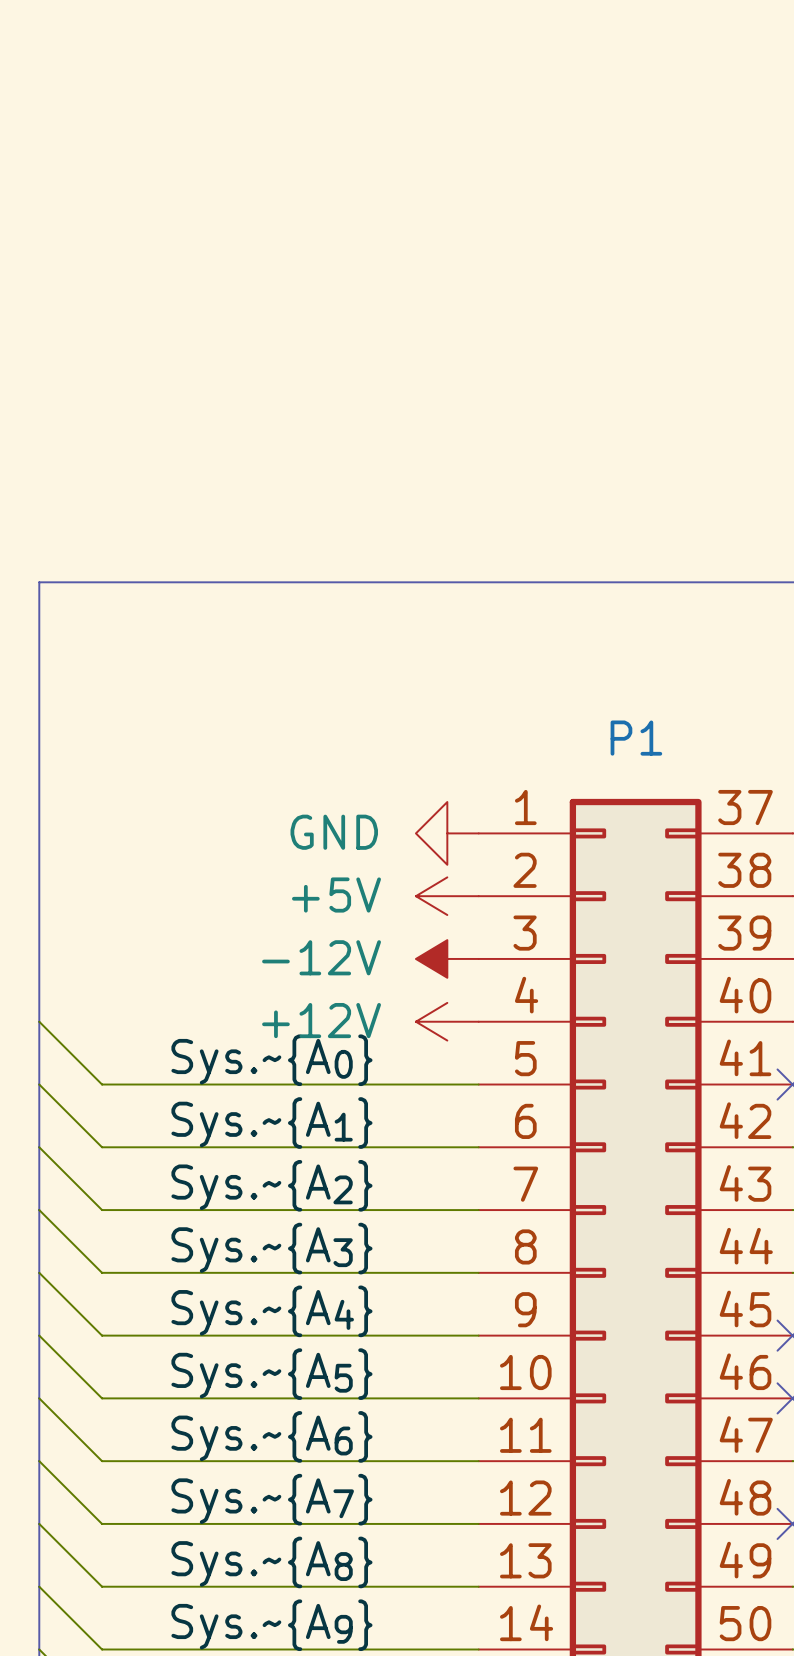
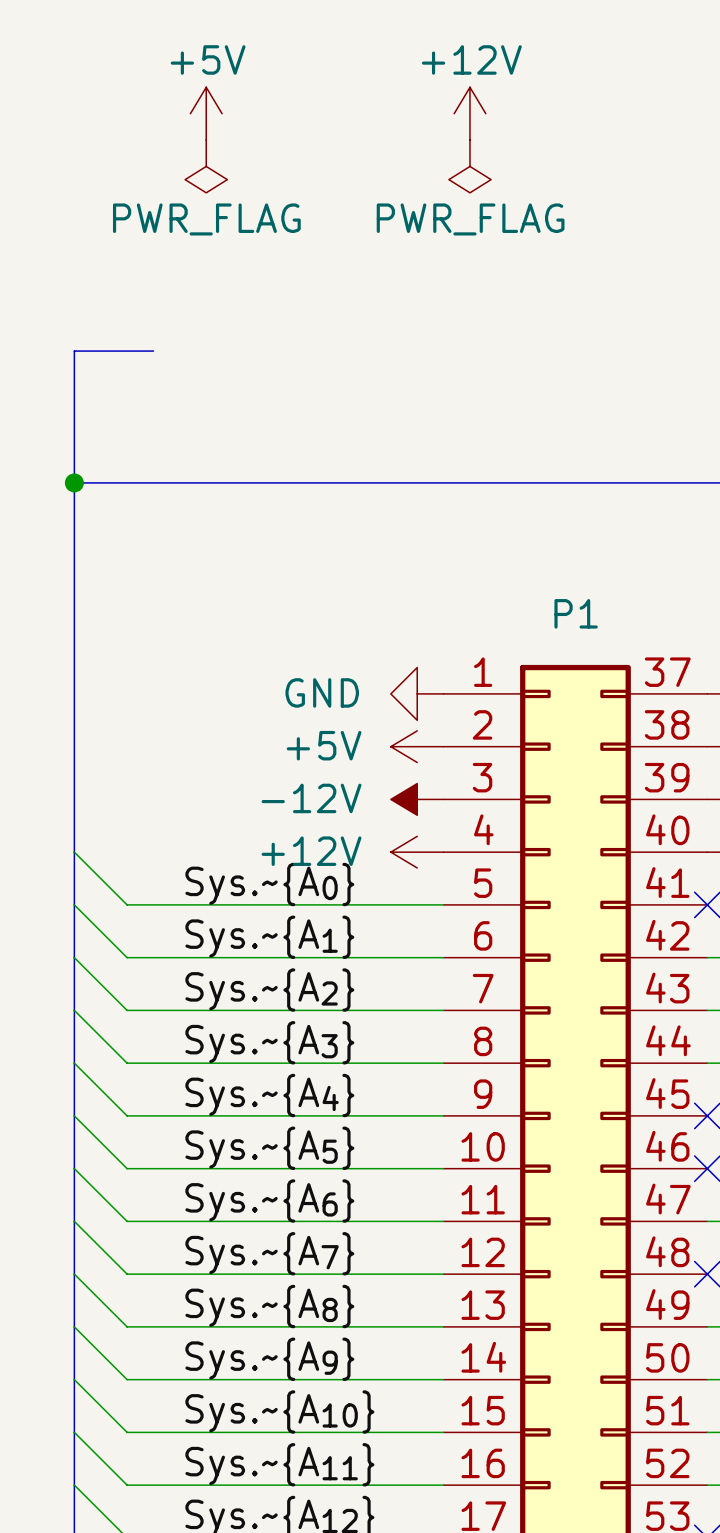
power symbol: none -> +5V (206, 113)
power symbol: none -> +12V (469, 113)
power symbol: none -> PWR_FLAG (206, 166)
power symbol: none -> PWR_FLAG (469, 166)
bus: none -> (153, 351) (74, 351) (74, 482)
junction: none -> (74, 482)

